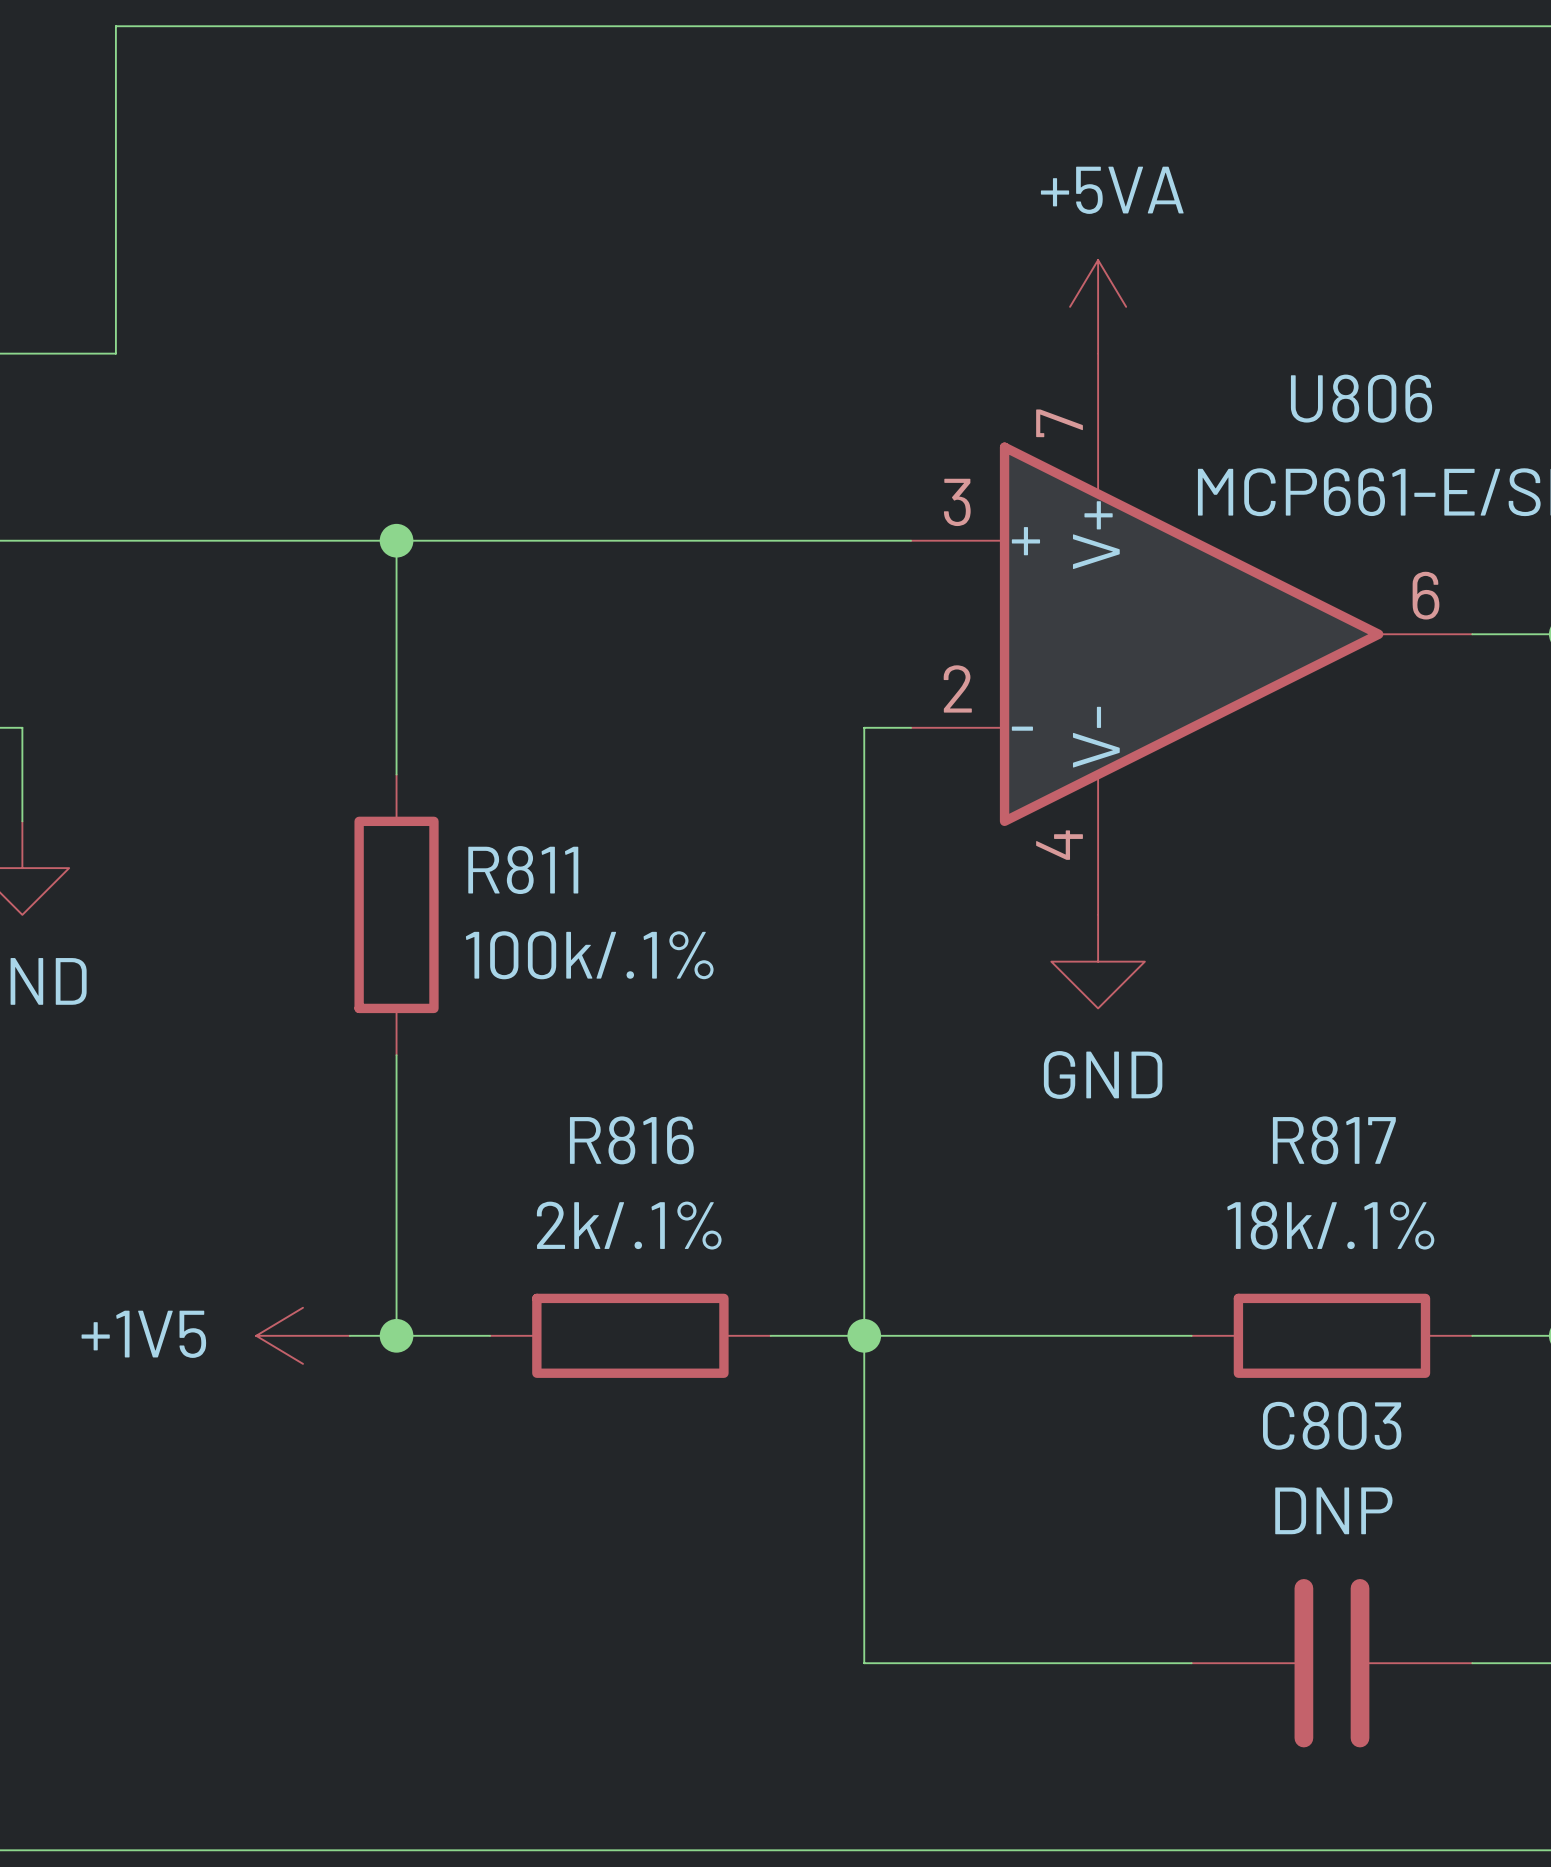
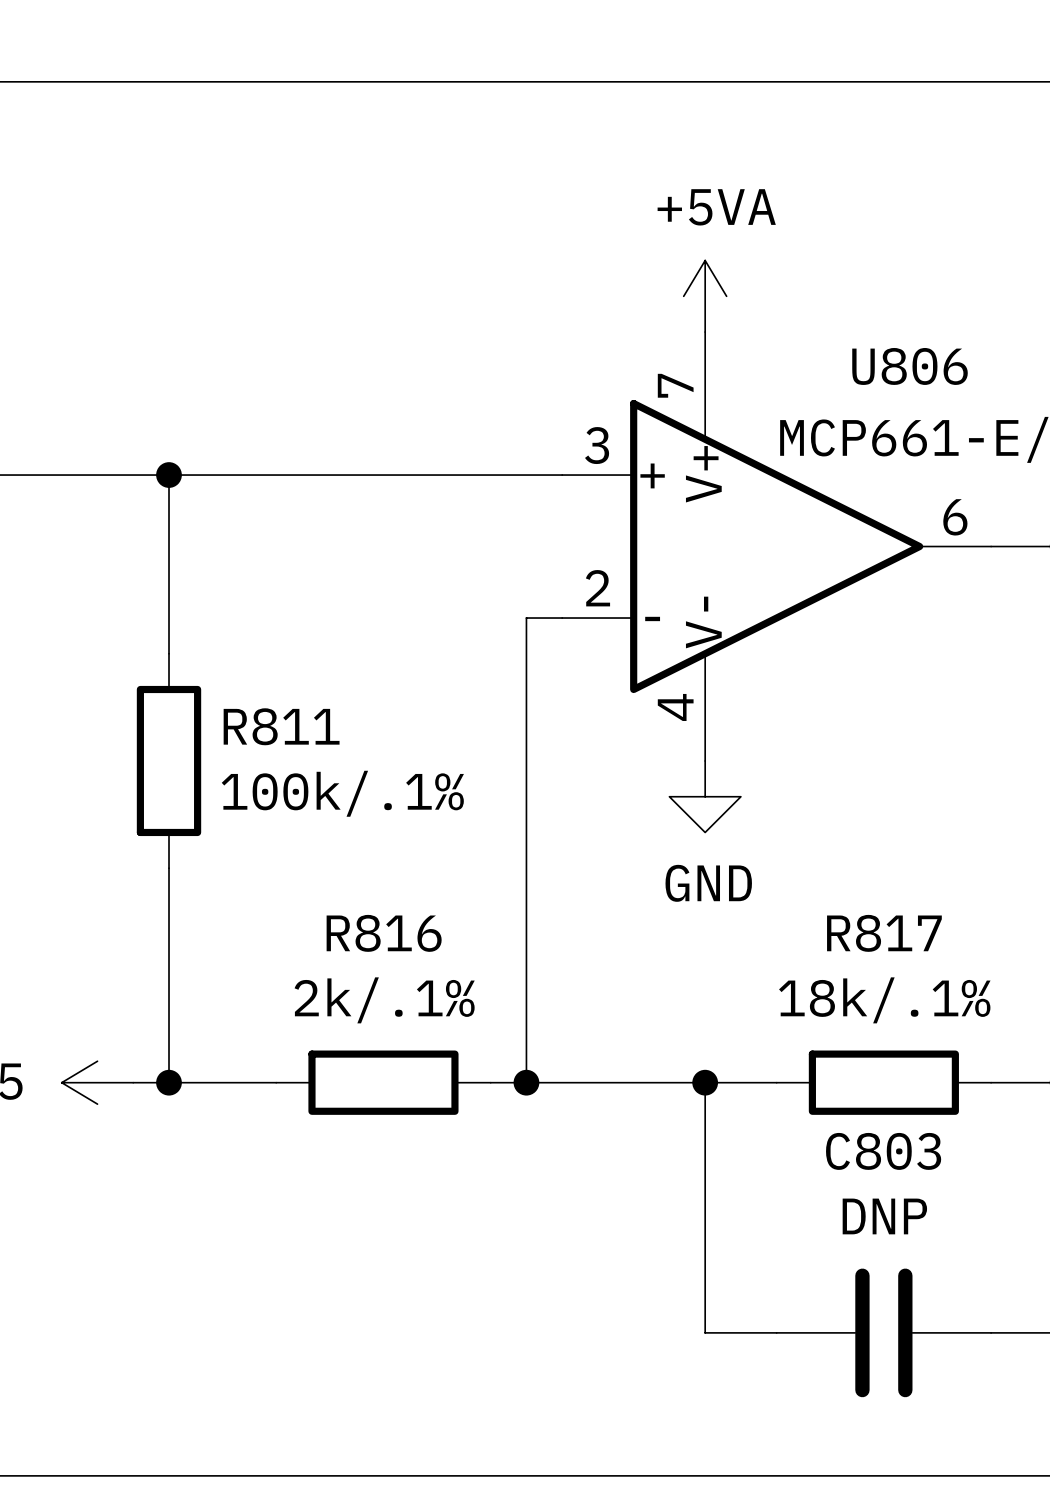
R816 position: (630, 1335) -> (383, 1082)
wire: (864, 1335) (864, 1663) (1098, 1663) -> (705, 1082) (705, 1332)
junction: none -> (705, 1082)

